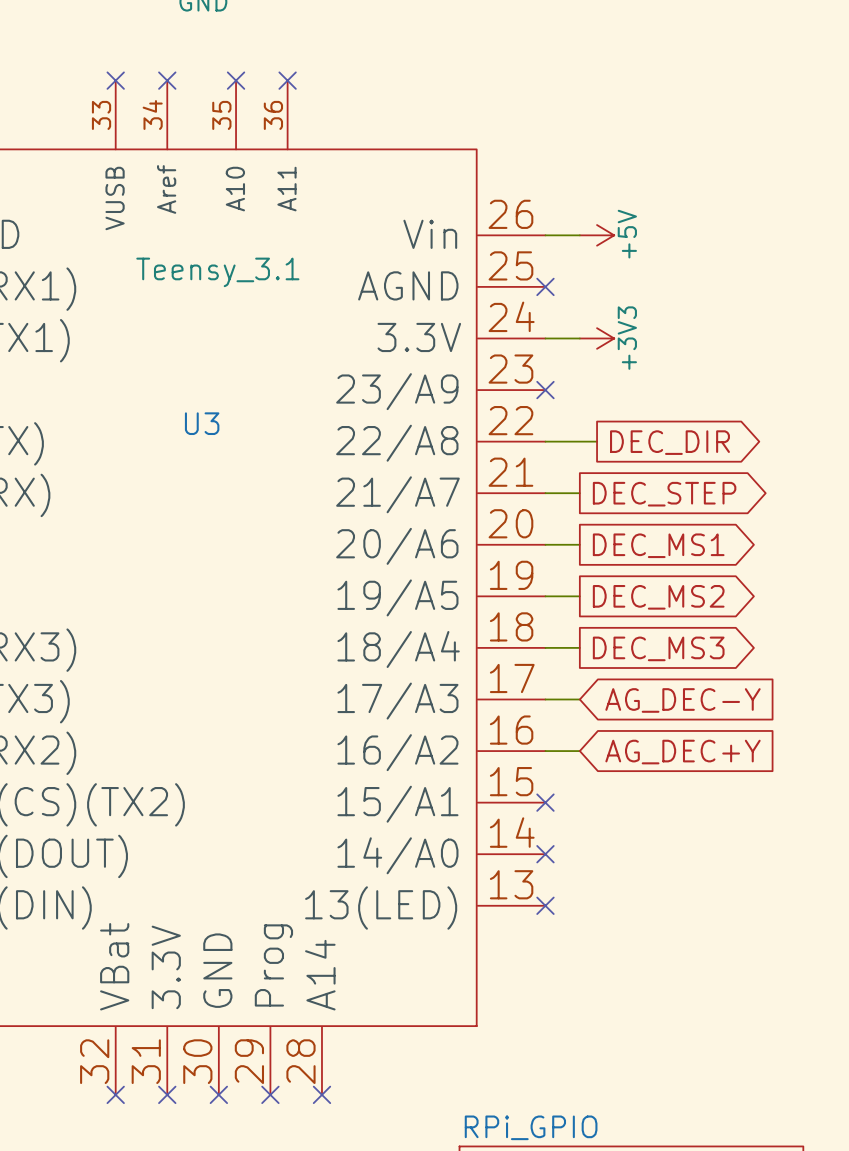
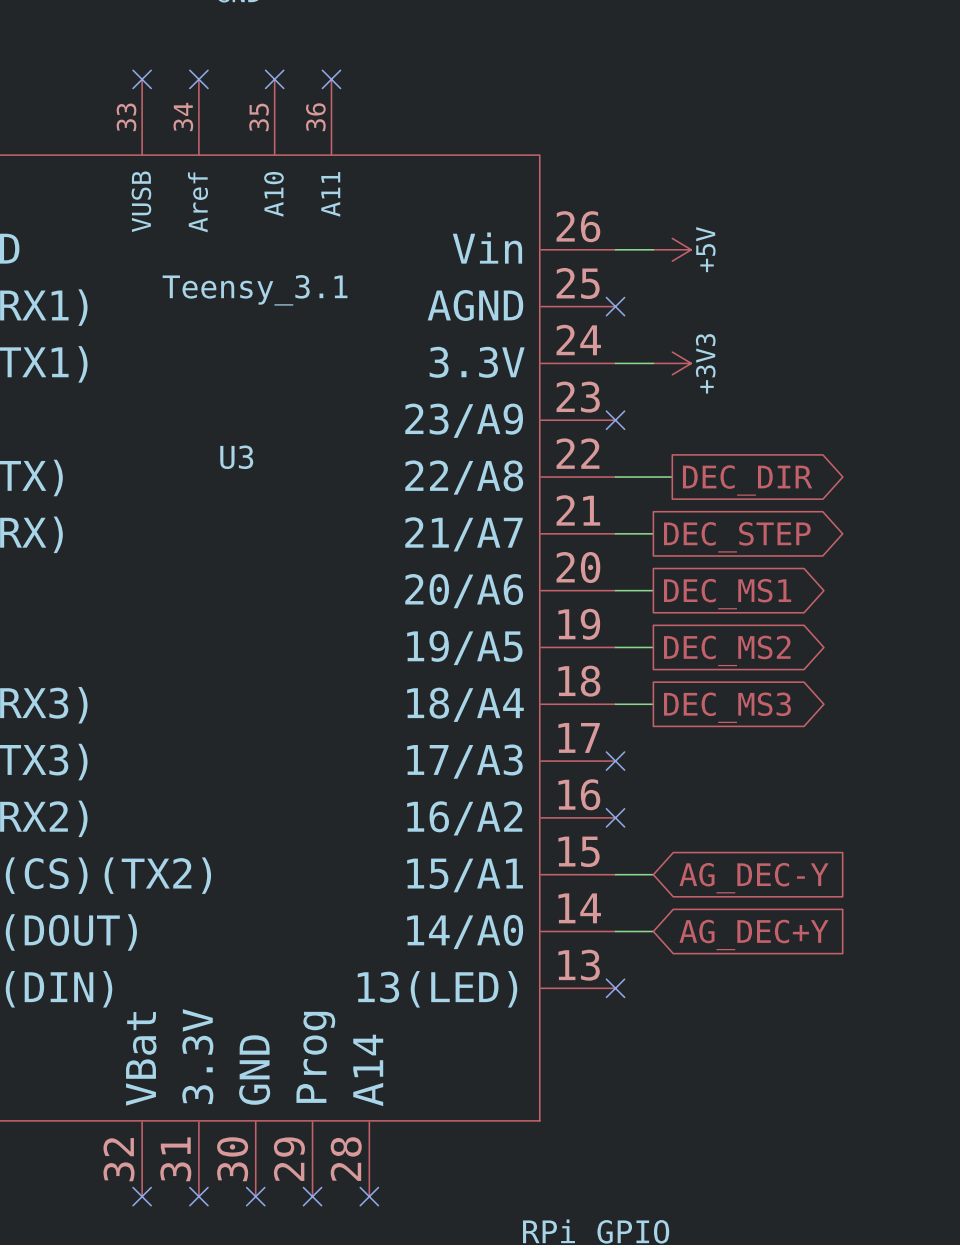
wire: (545, 699) (579, 699) -> (615, 931) (653, 931)
no-connect mark: none -> (615, 761)
global label position: AG_DEC-Y (682, 700) -> AG_DEC-Y (754, 878)
wire: (545, 751) (579, 751) -> (615, 874) (653, 874)
no-connect mark: none -> (615, 817)
global label position: AG_DEC+Y (682, 752) -> AG_DEC+Y (754, 934)
no-connect mark: (545, 802) -> none
no-connect mark: (545, 854) -> none

